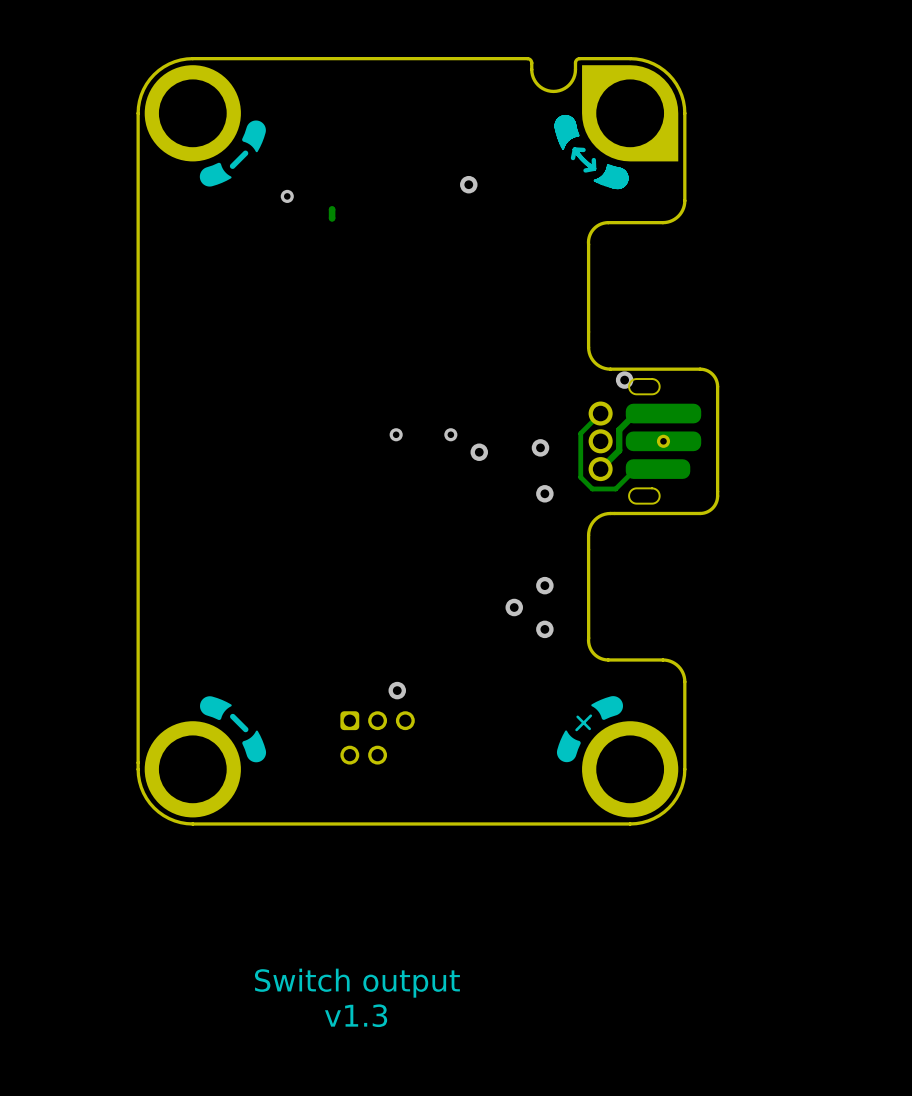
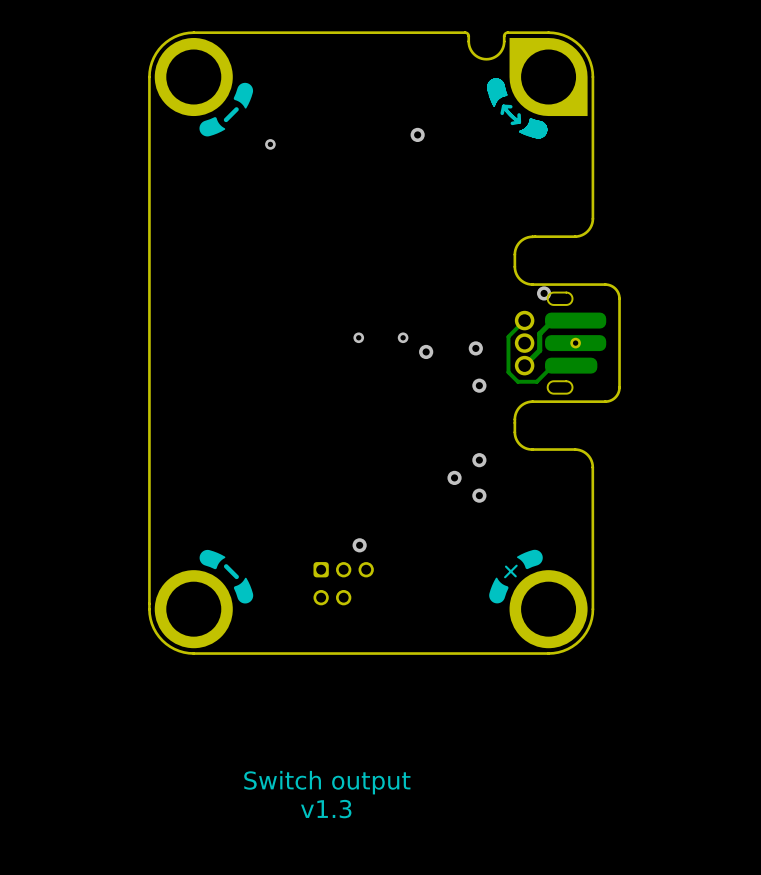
board edge: (684, 200) (681, 212) (670, 221) (605, 222) (599, 224) (592, 231) (588, 242) (588, 331) -> (592, 147) (592, 221) (587, 231) (575, 236)
part: (332, 213) -> none
part footprint: [578, 330, 720, 552] -> [506, 235, 621, 451]
board edge: (588, 549) (589, 647) (595, 655) (603, 659) (665, 660) (672, 662) (680, 668) (684, 681) (684, 769) -> (575, 449) (587, 454) (592, 465) (592, 609)

